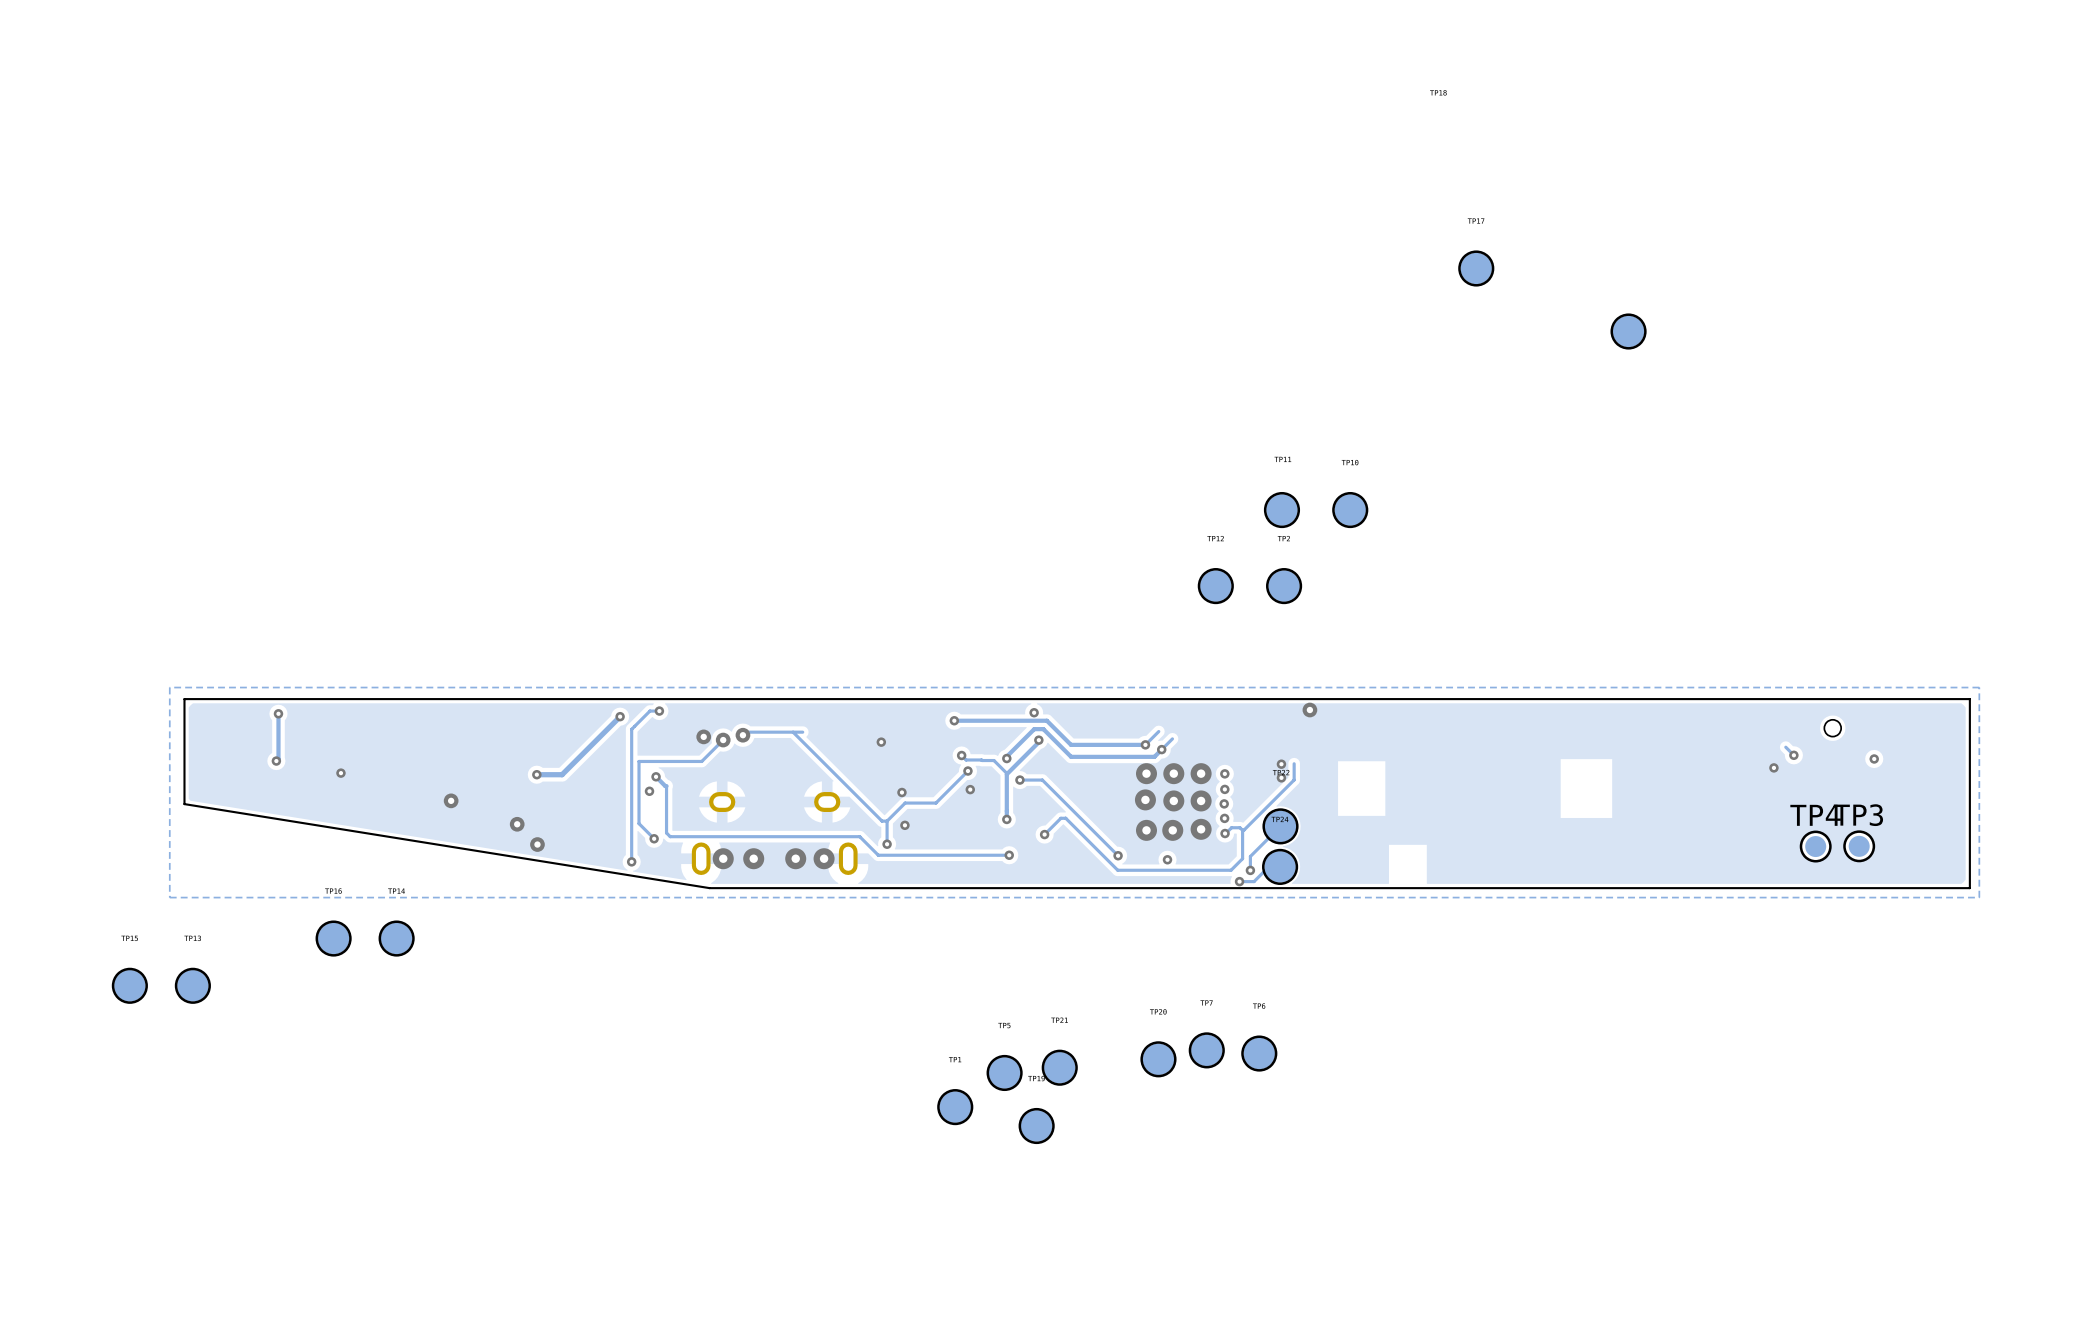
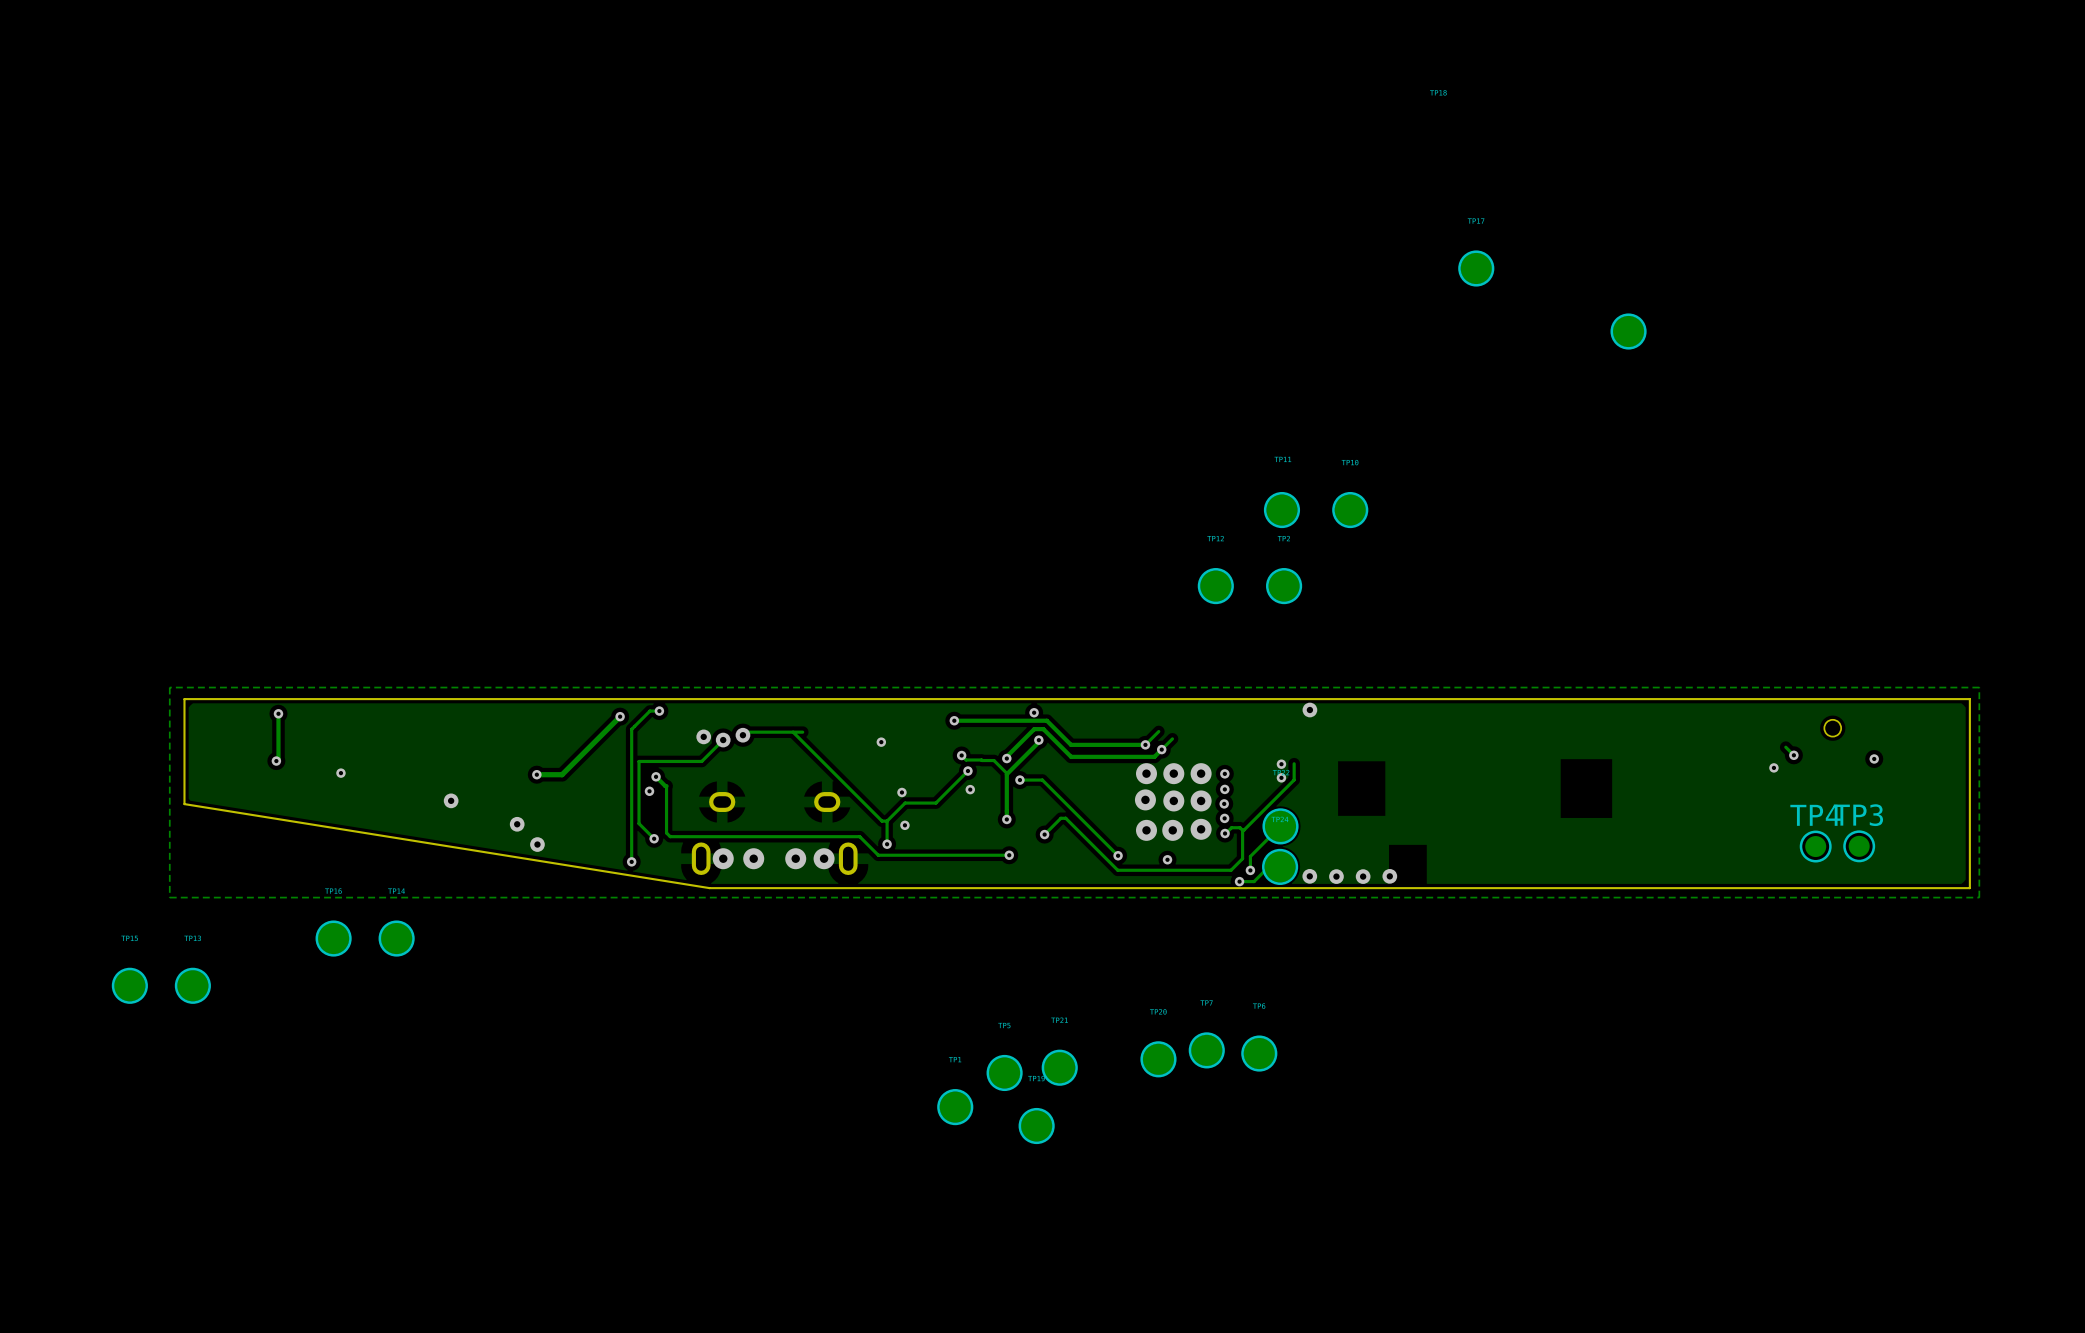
via: none -> (1309, 876)
via: none -> (1336, 876)
via: none -> (1363, 876)
via: none -> (1389, 876)

